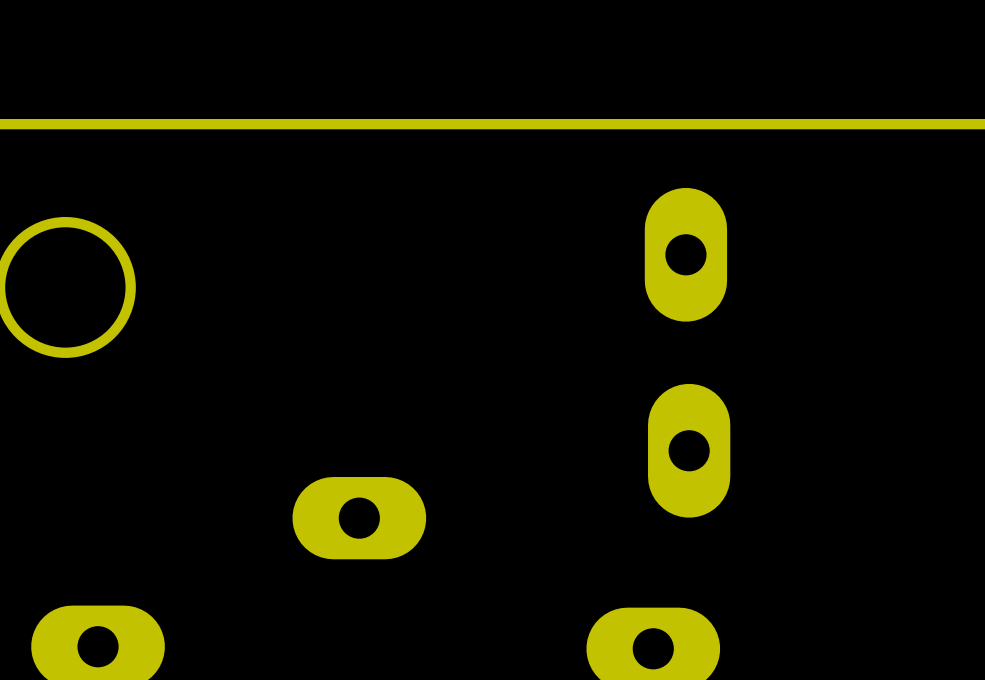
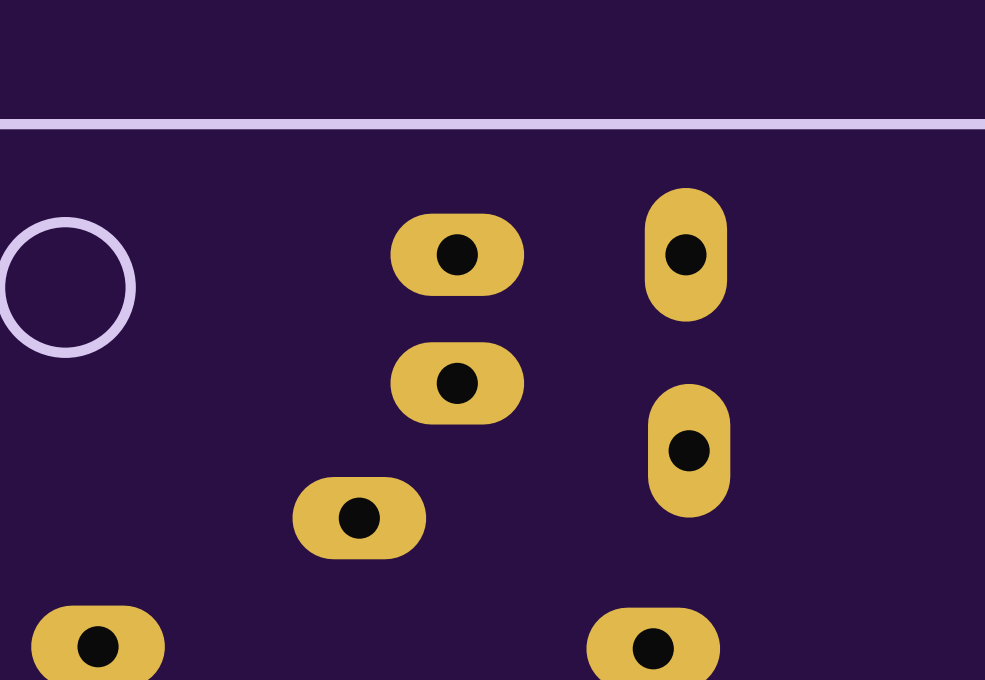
part: none -> (457, 319)

